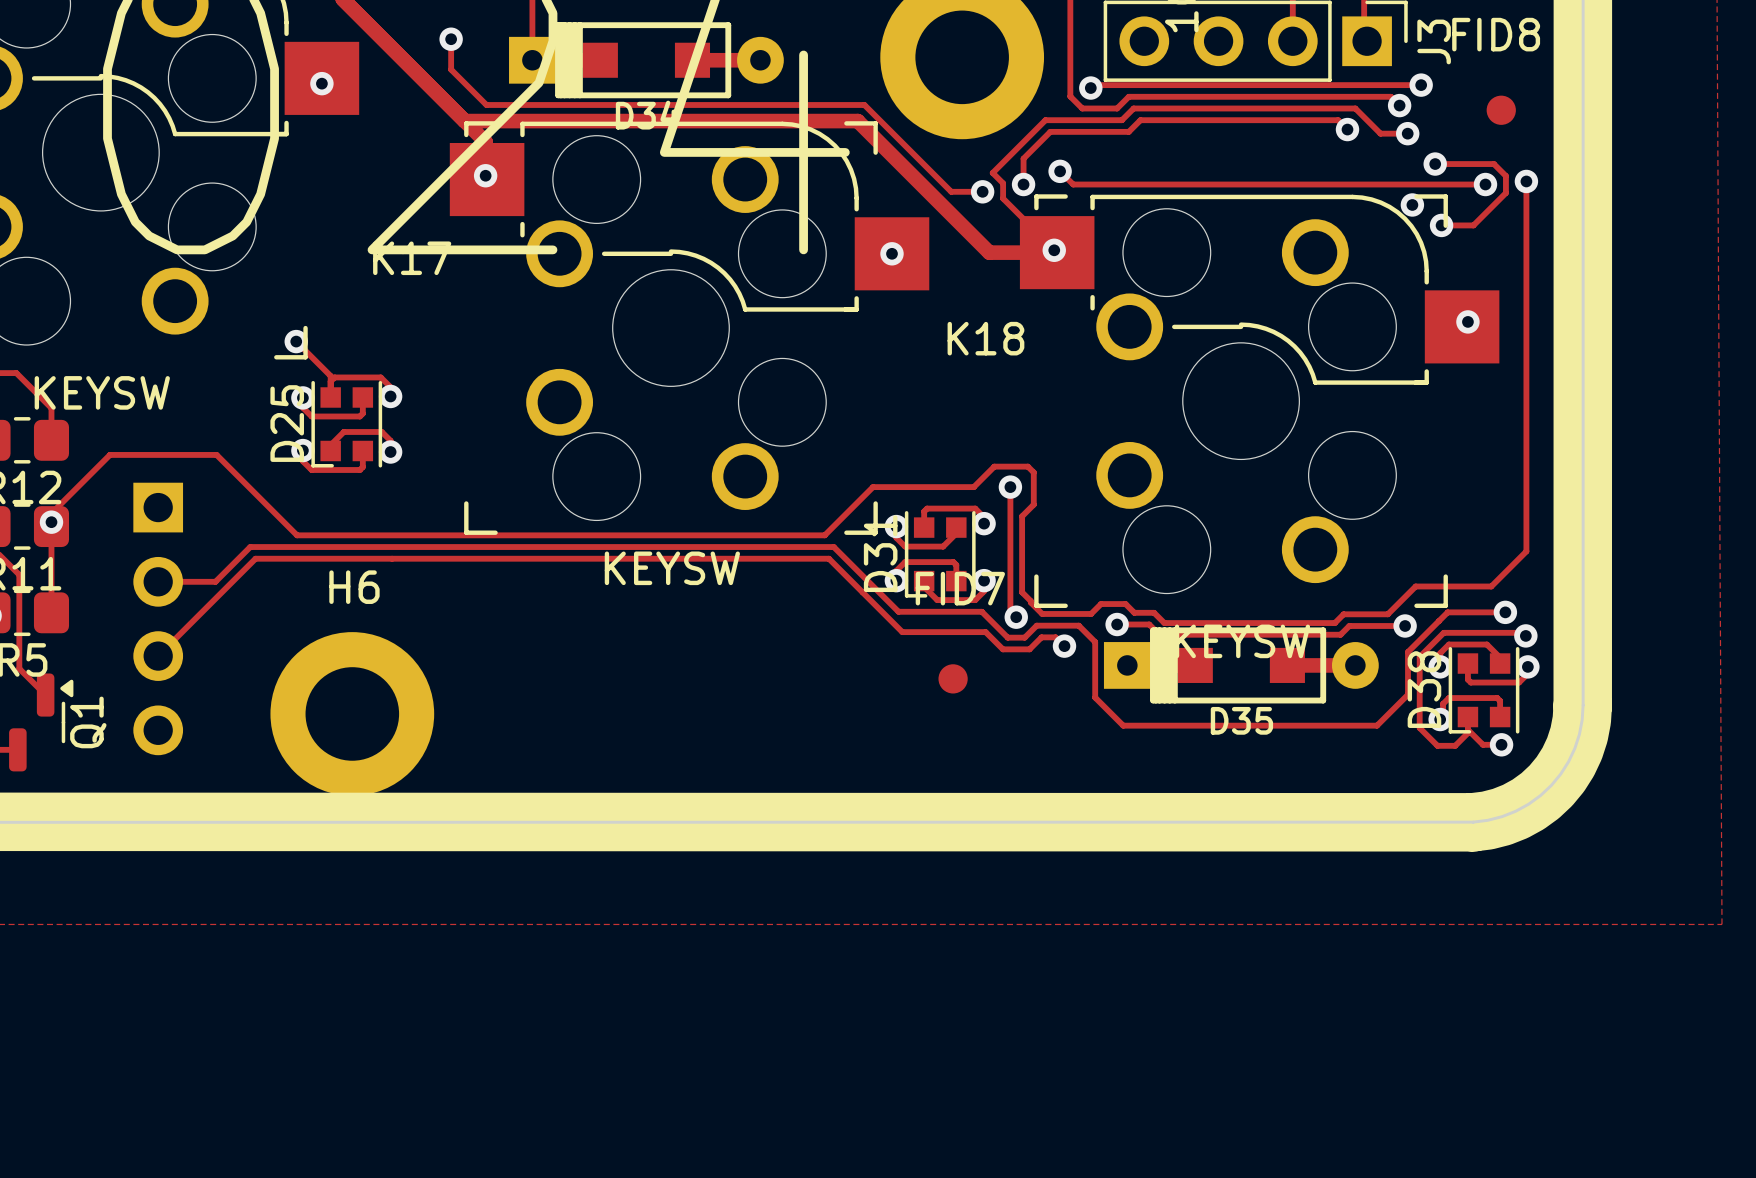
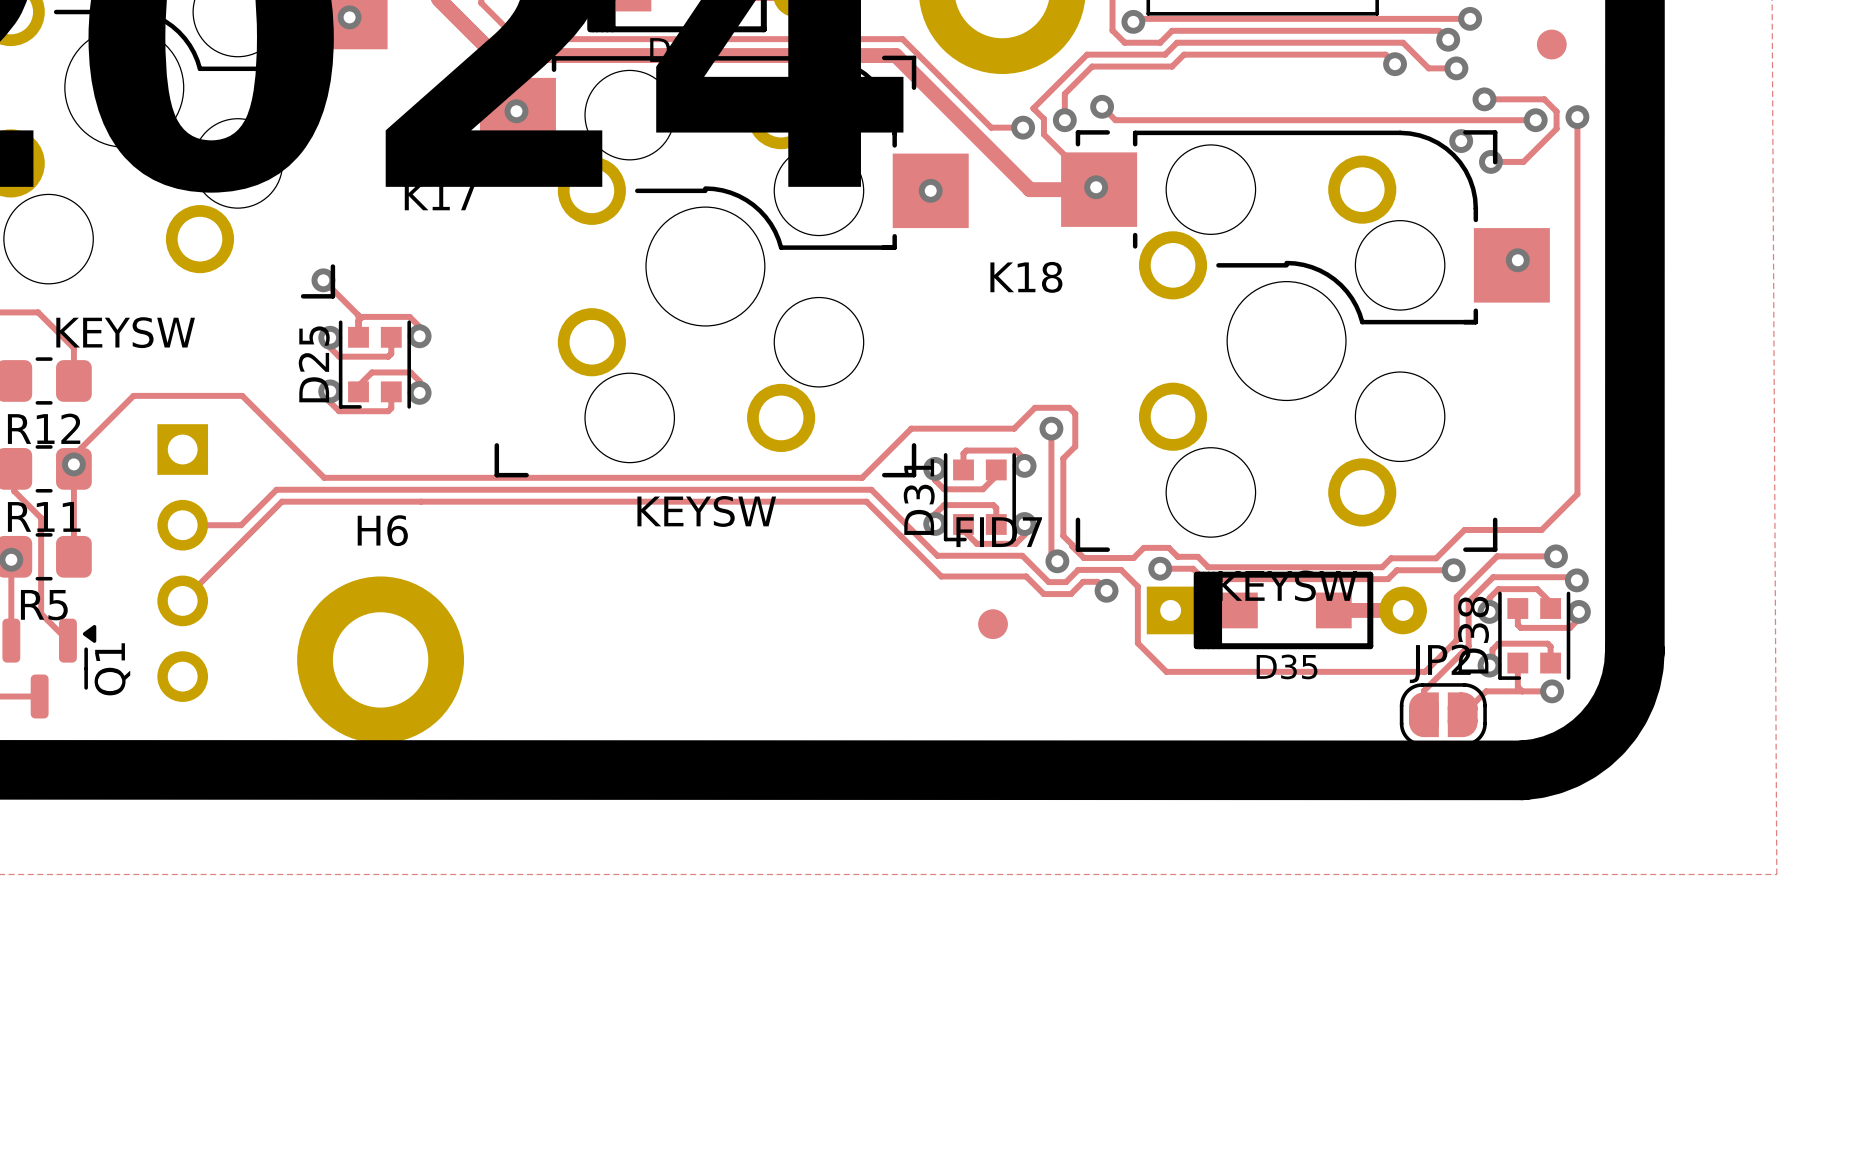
track: (1419, 700) (1419, 727) (1437, 745) (1455, 745) (1467, 733) -> (1522, 691) (1517, 686) (1517, 679)
track: none -> (1468, 646) (1423, 690) (1423, 714)
track: (1467, 729) (1482, 744) -> (1462, 714) (1486, 691) (1533, 691)
JP2: none -> (1443, 714)

